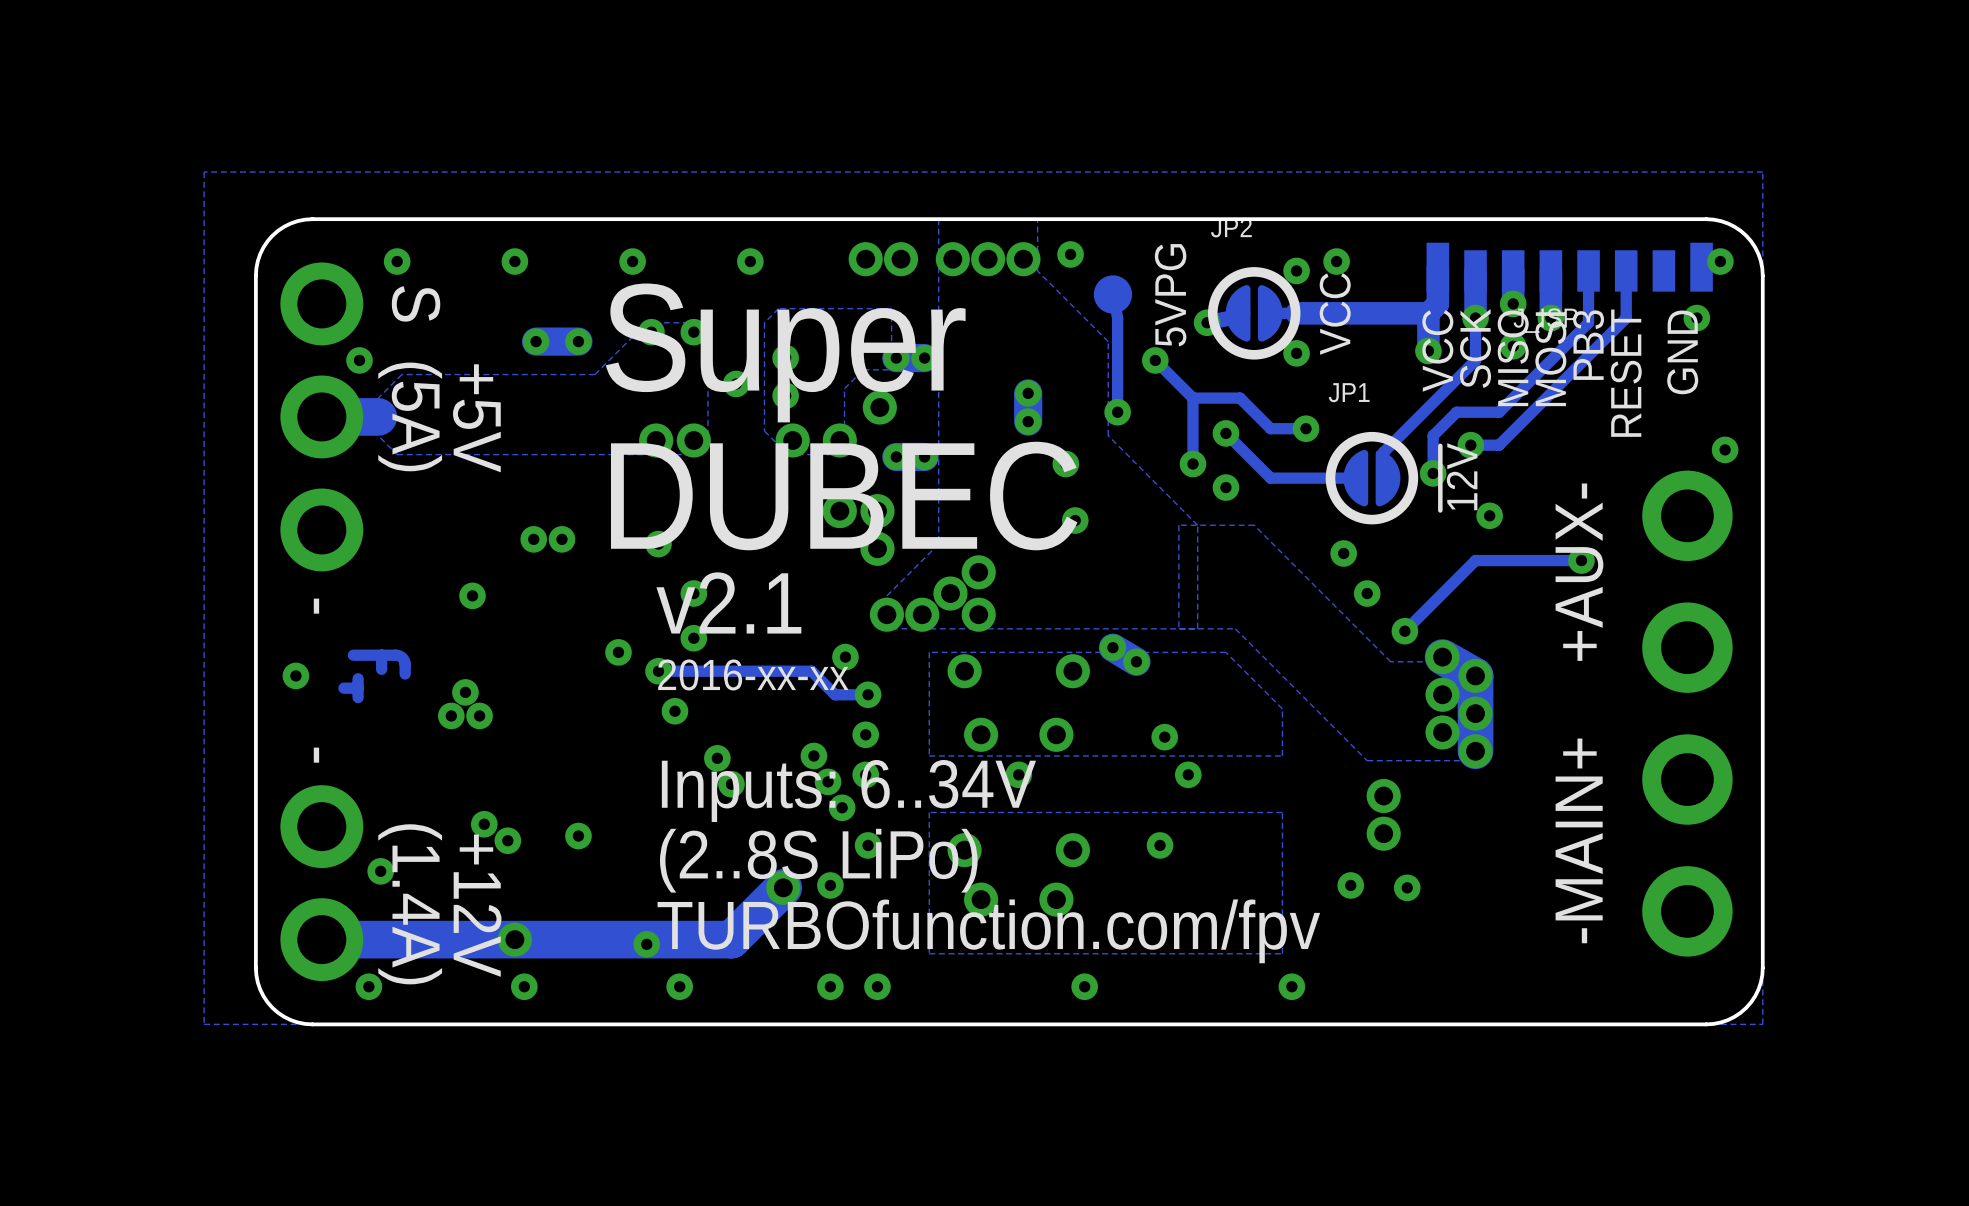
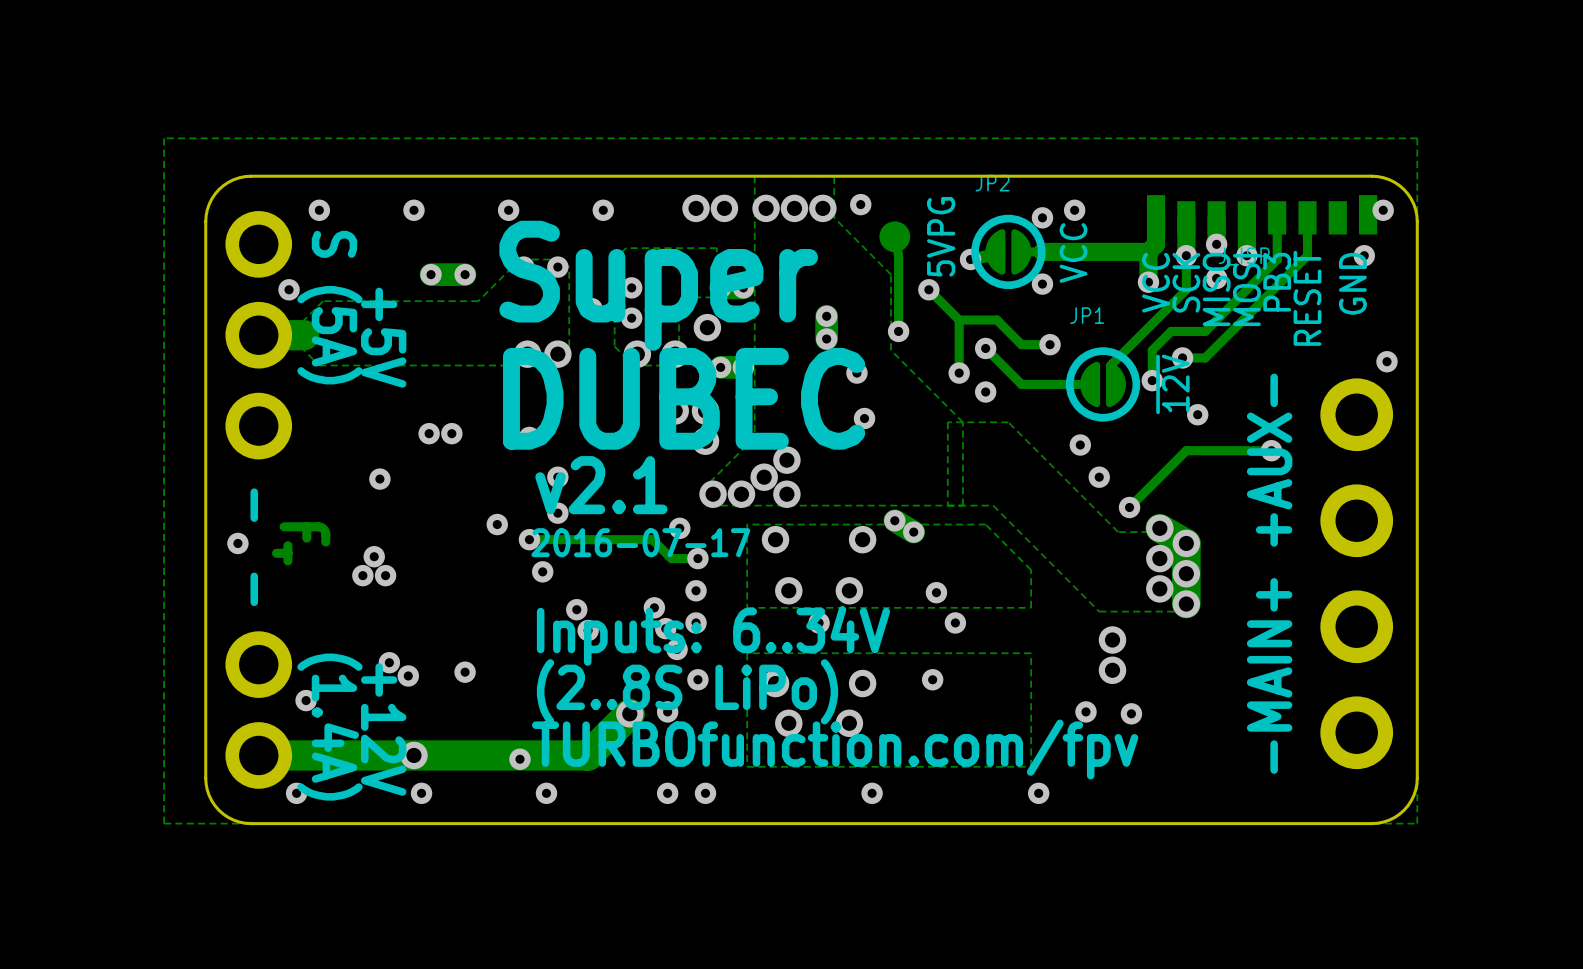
text: 2016-xx-xx (753, 674) -> 2016-07-17 (640, 542)

